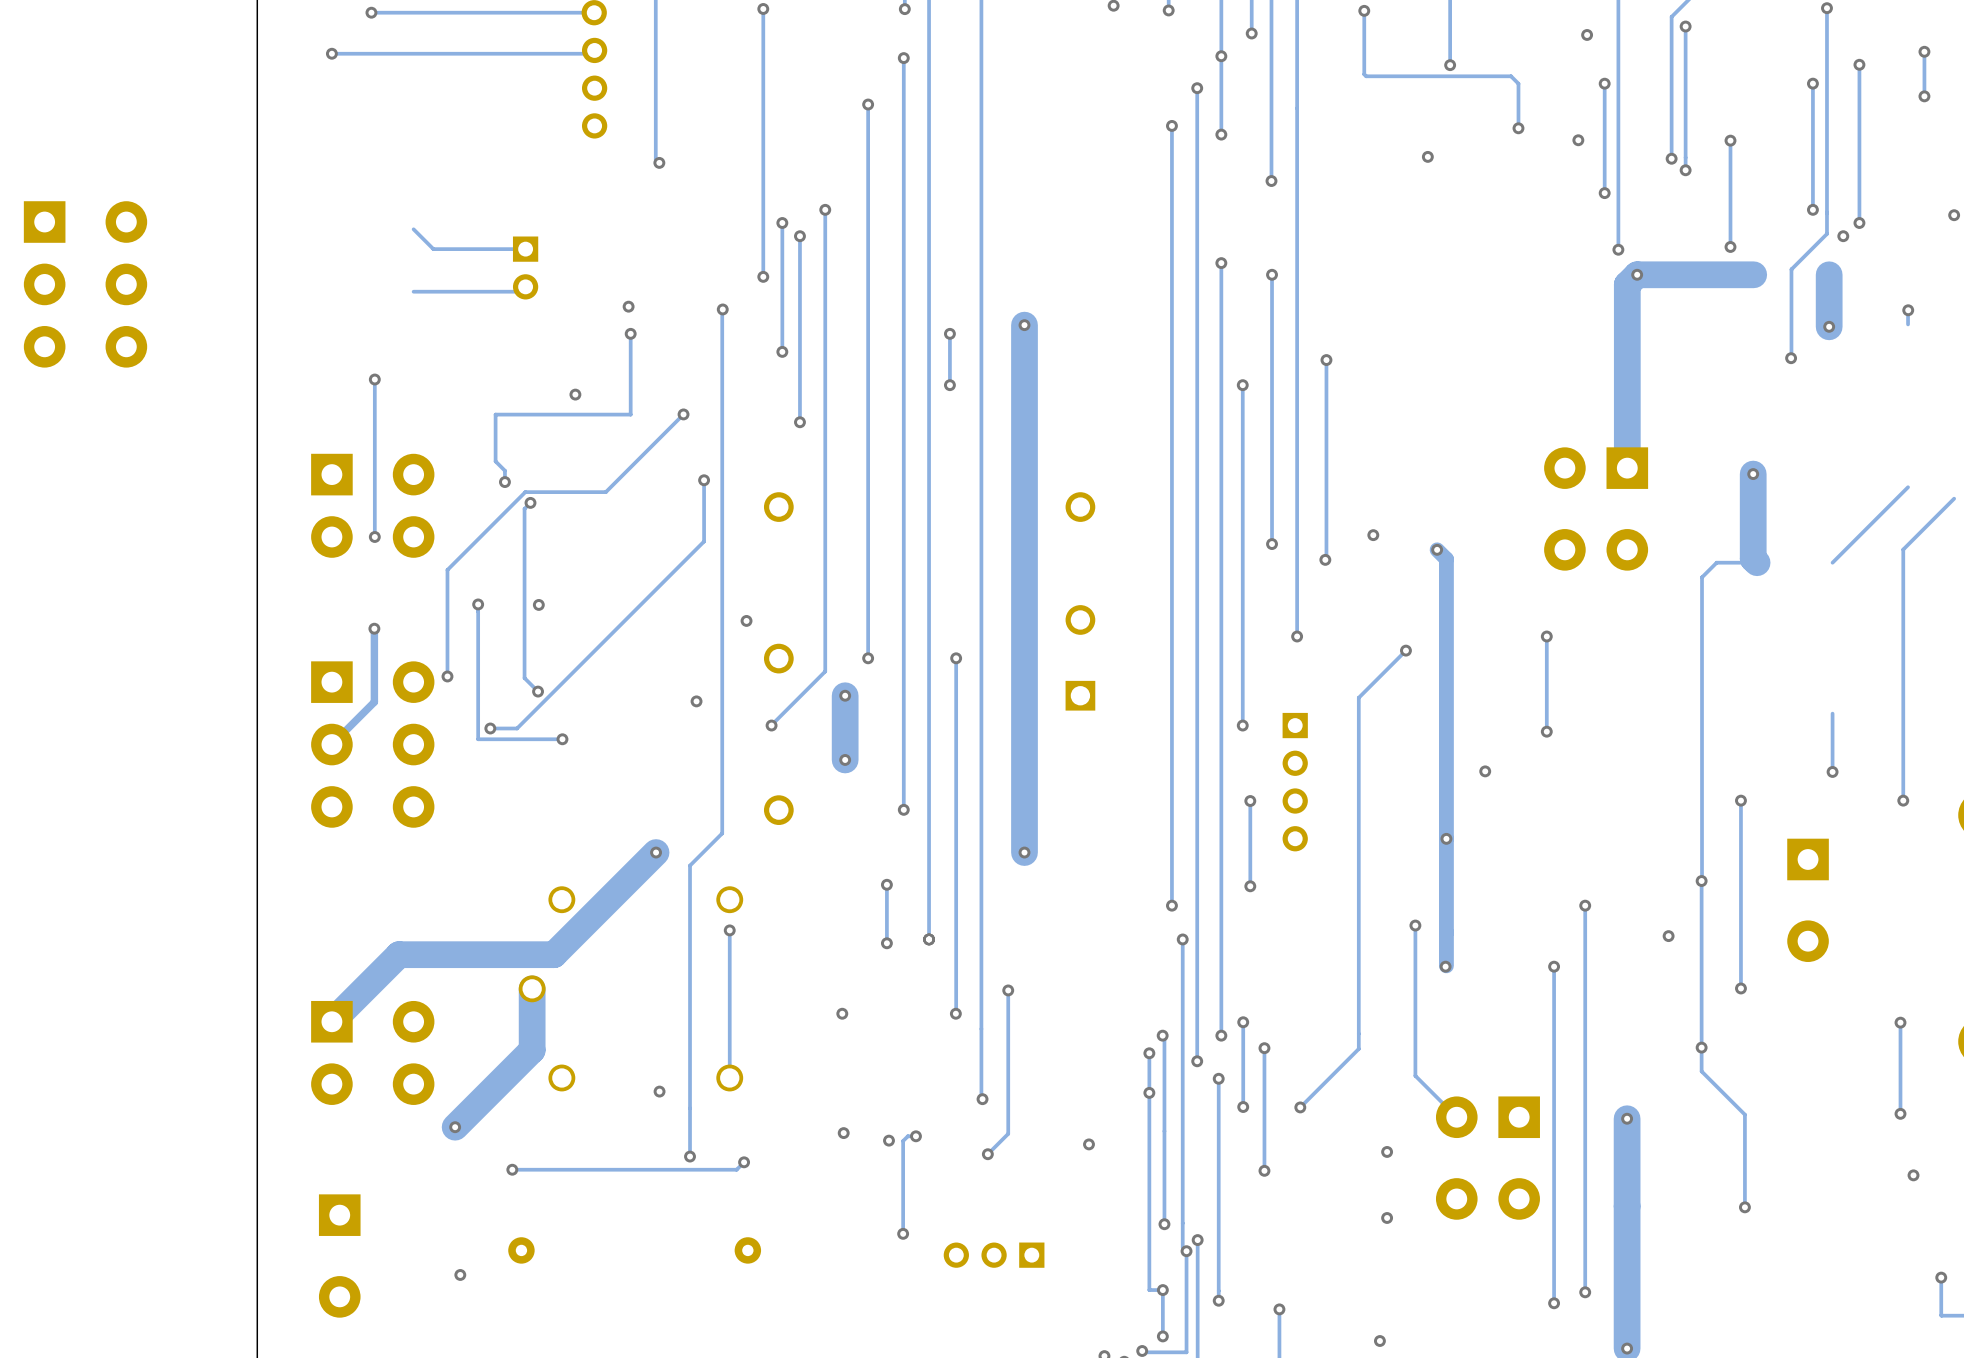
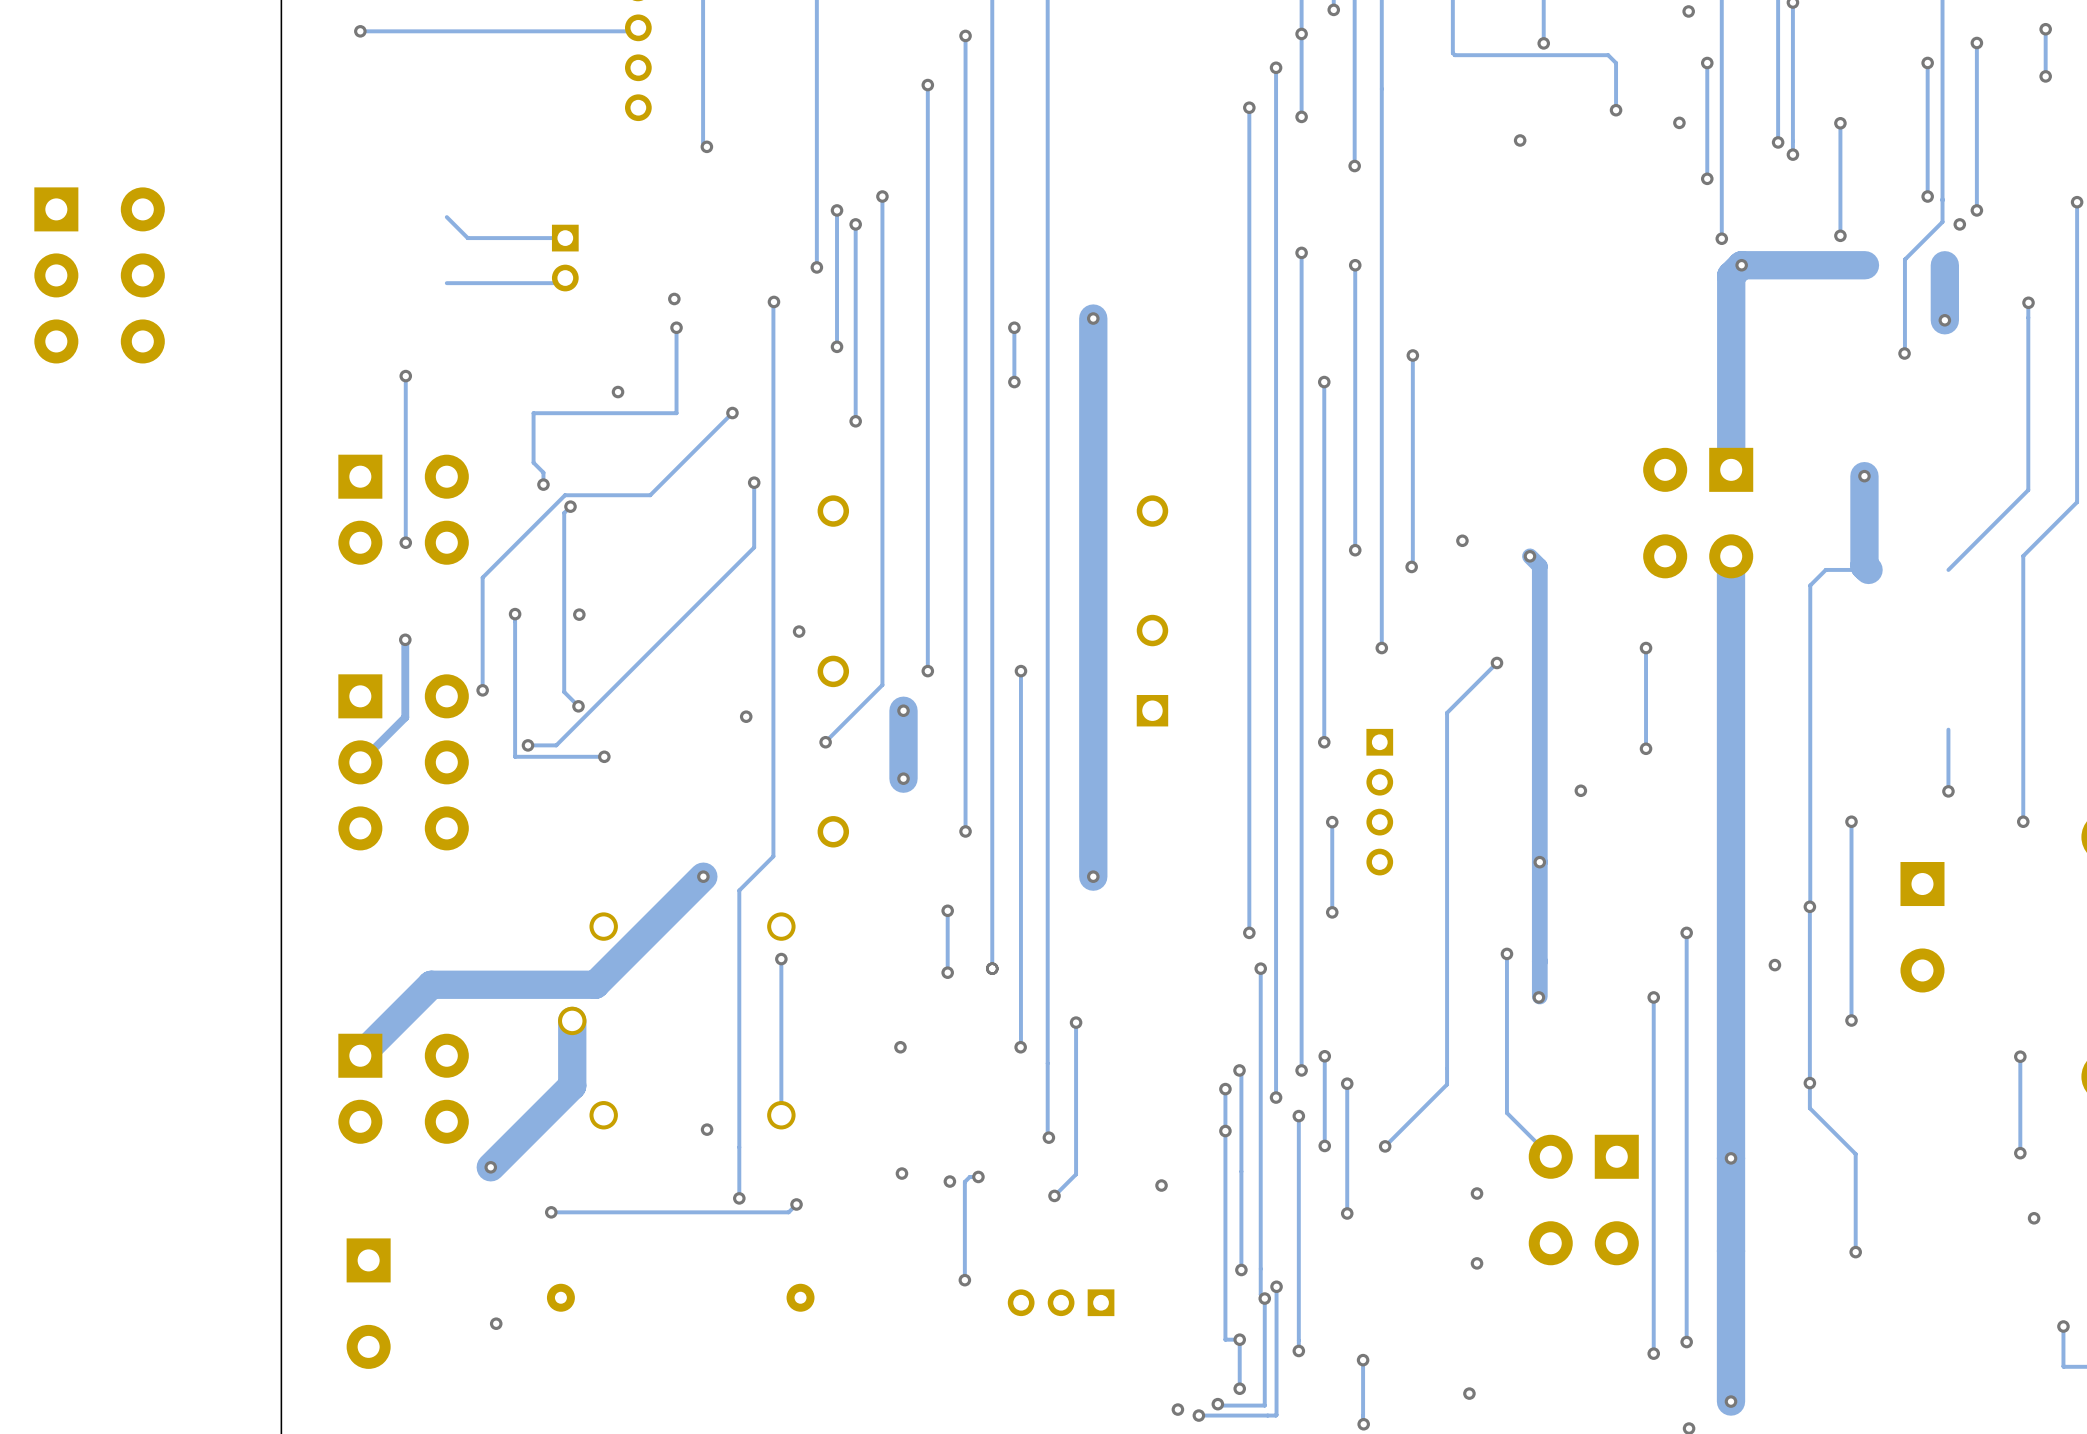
track: none -> (2077, 202) (2077, 502)
track: none -> (2028, 317) (2028, 490)
track: none -> (1731, 556) (1731, 1158)

